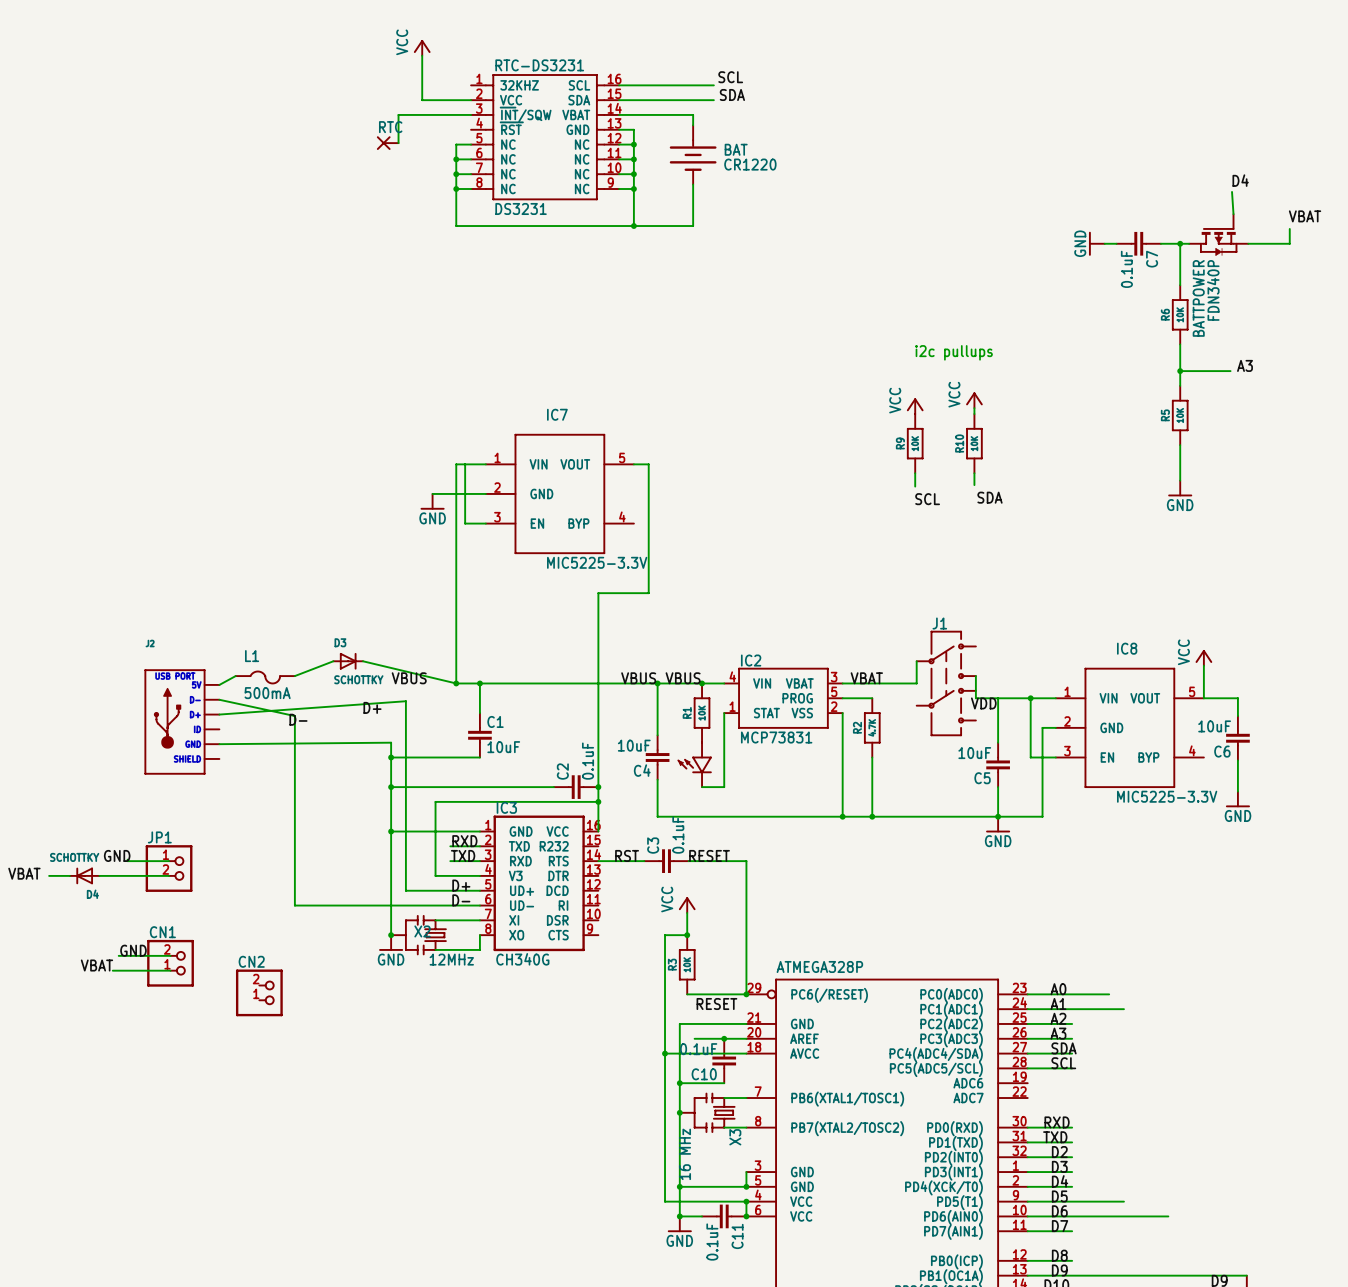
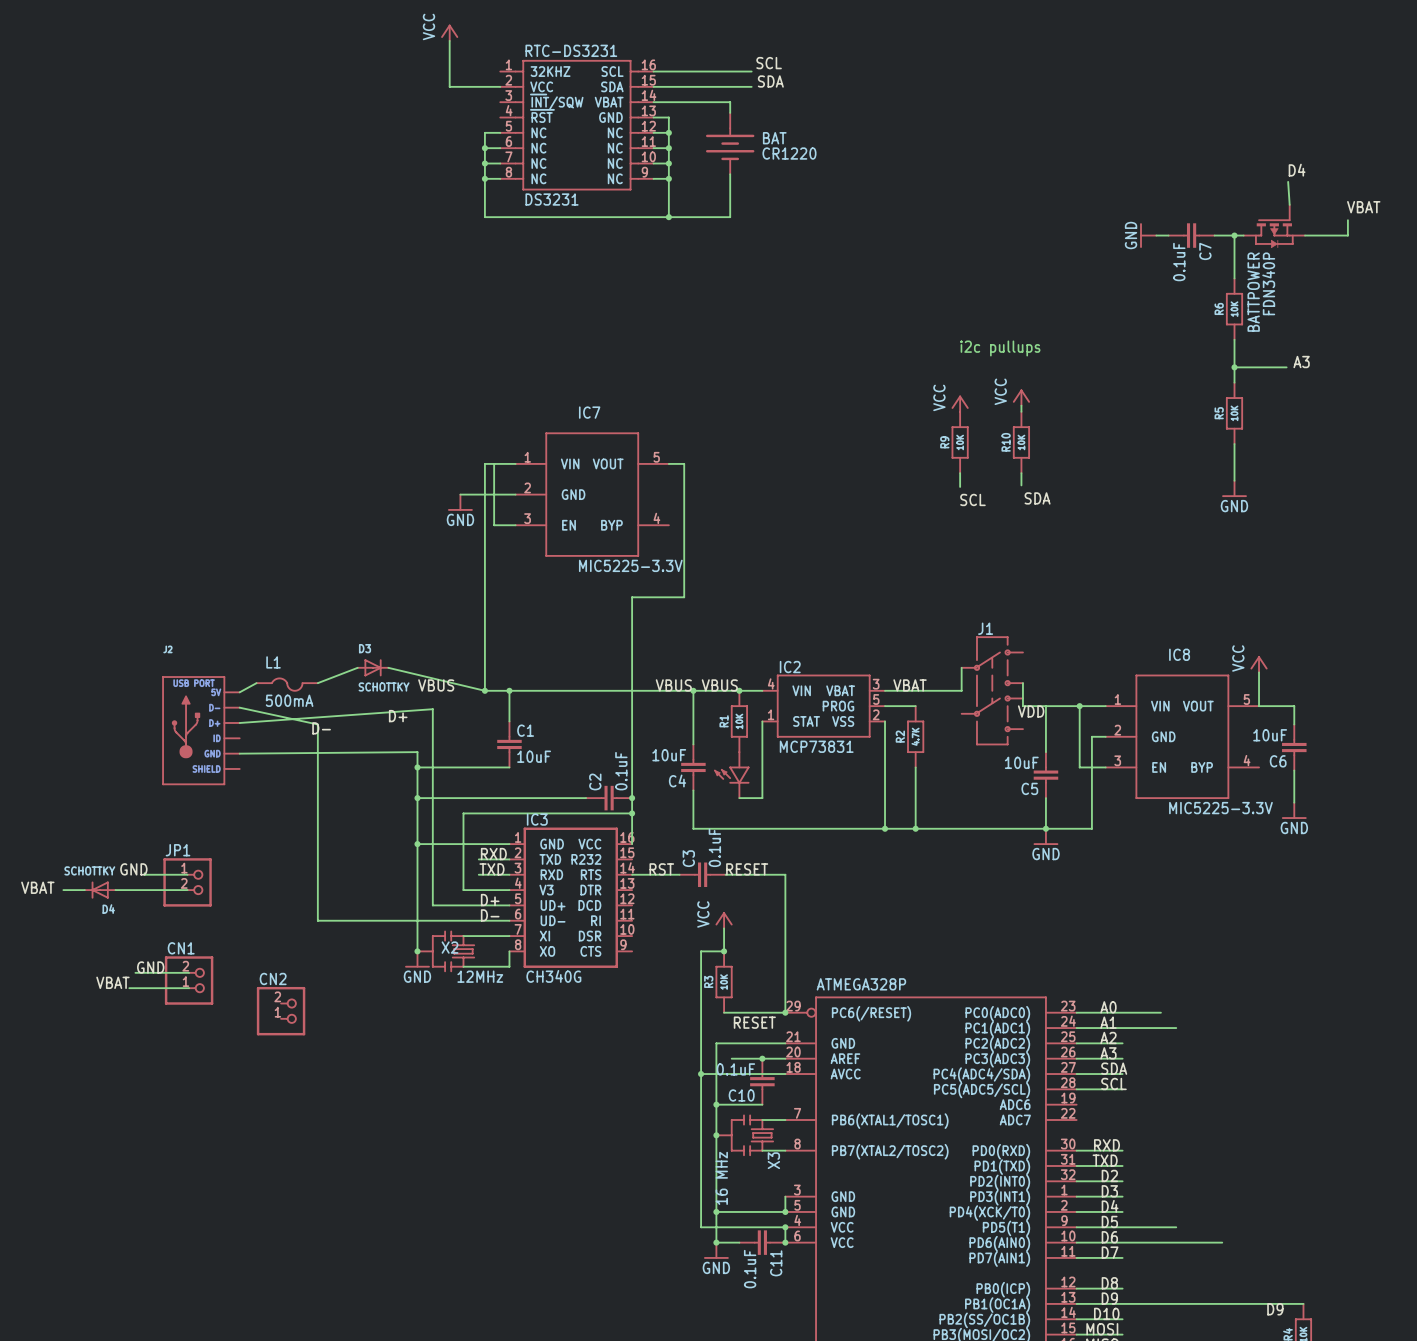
wire: (471, 114) (398, 114) (398, 143) -> none
RTC: (387, 143) -> none

